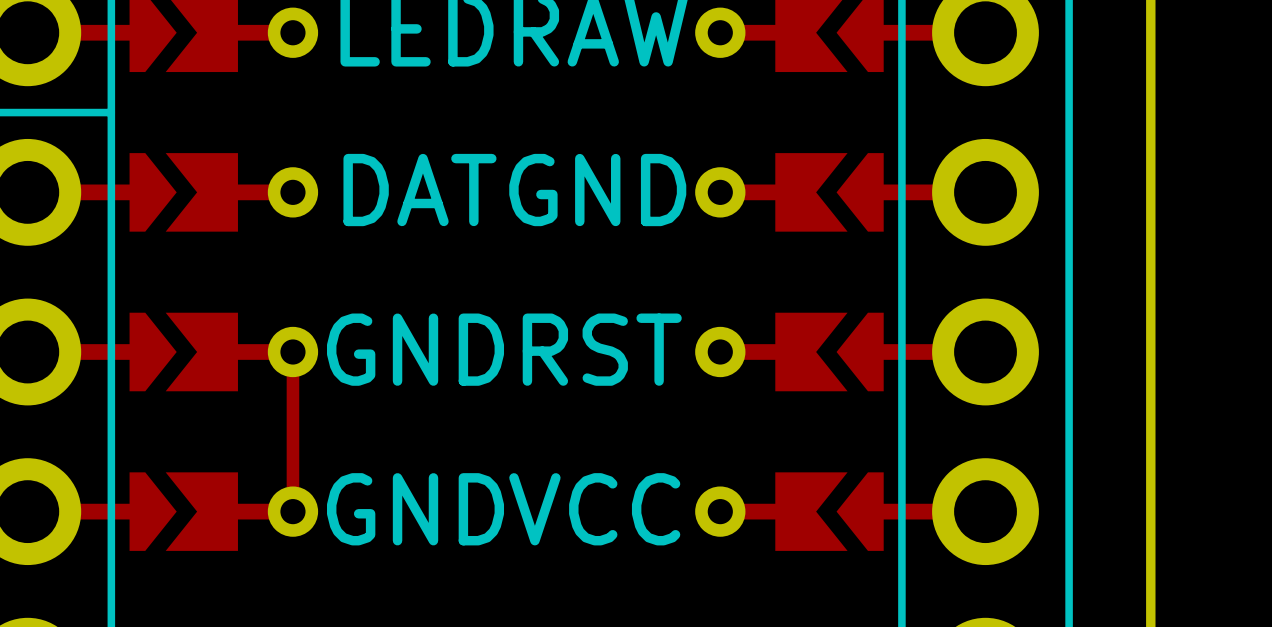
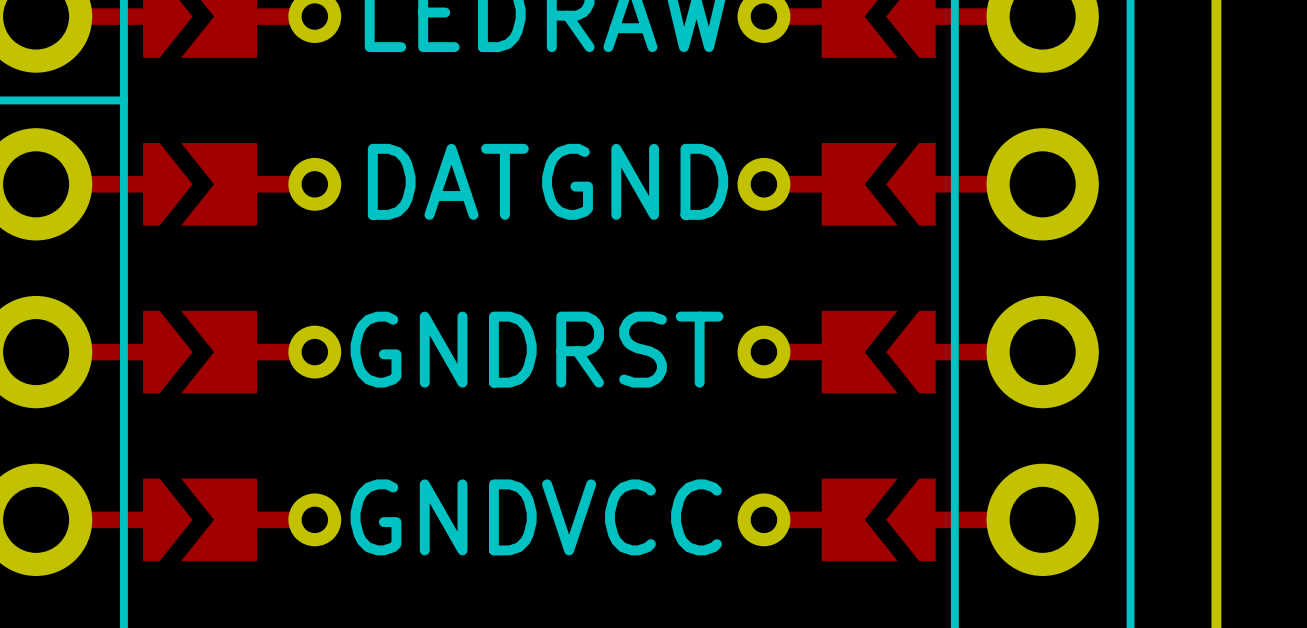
track: (292, 352) (292, 511) -> none

